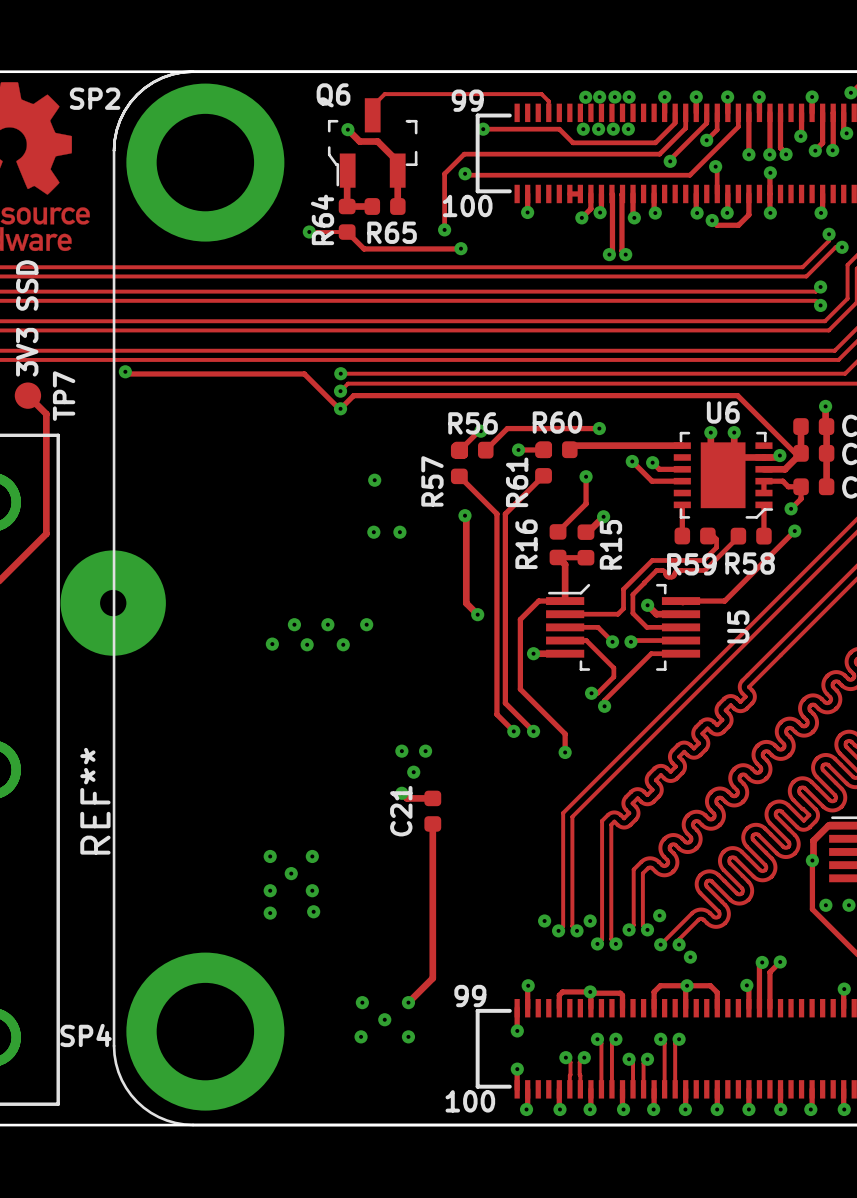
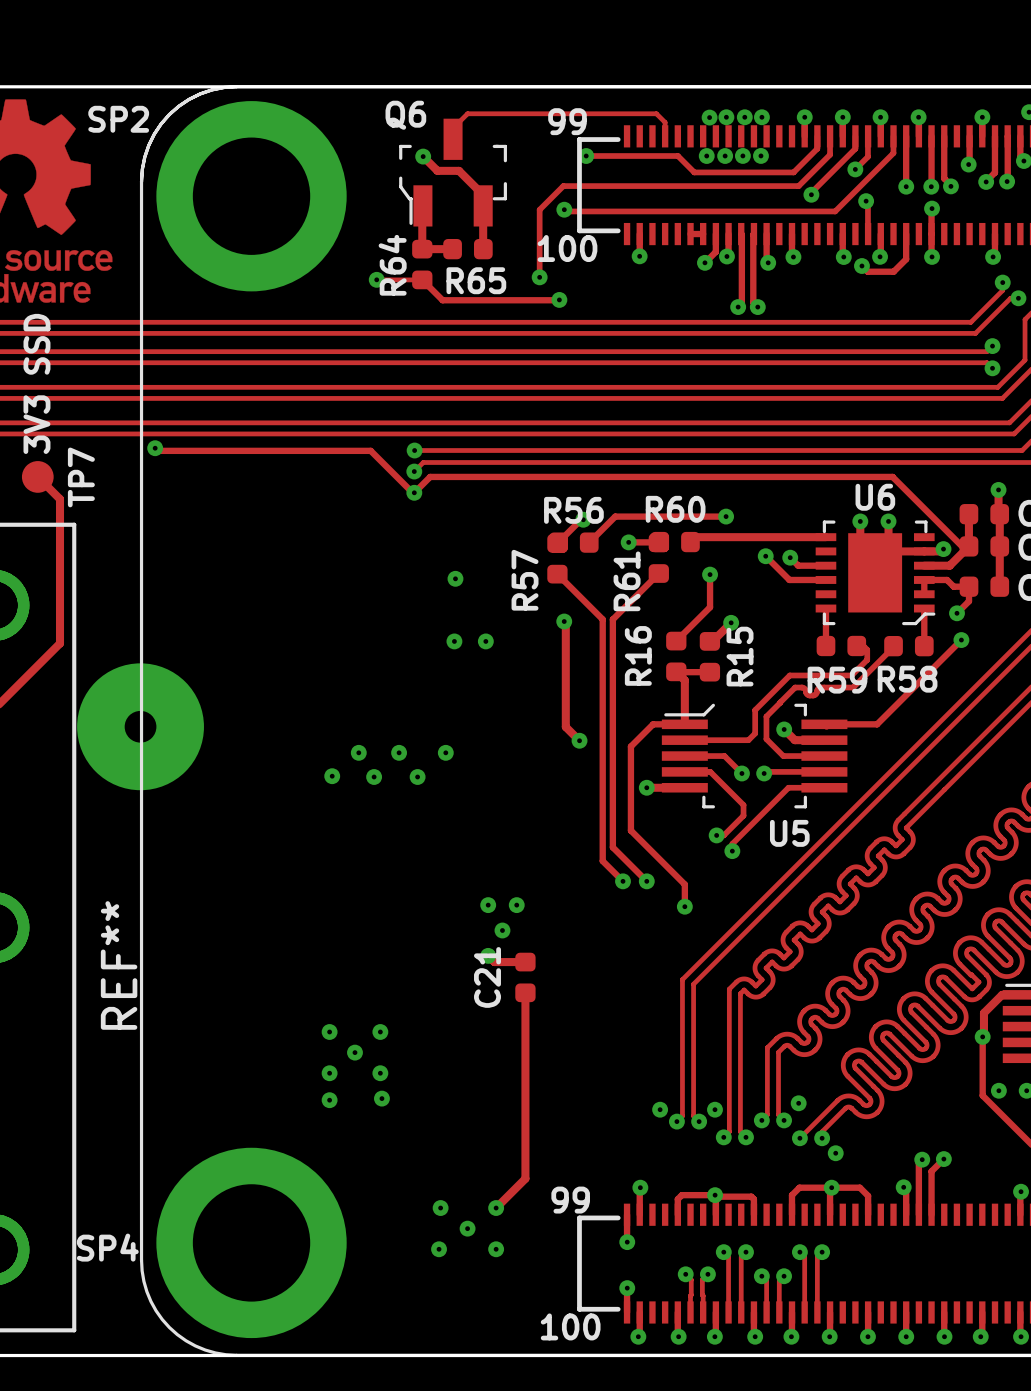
U5 name rotation: 0° (738, 626) -> 90° clockwise (789, 833)
U5 name position: U5 (738, 626) -> U5 (789, 833)

